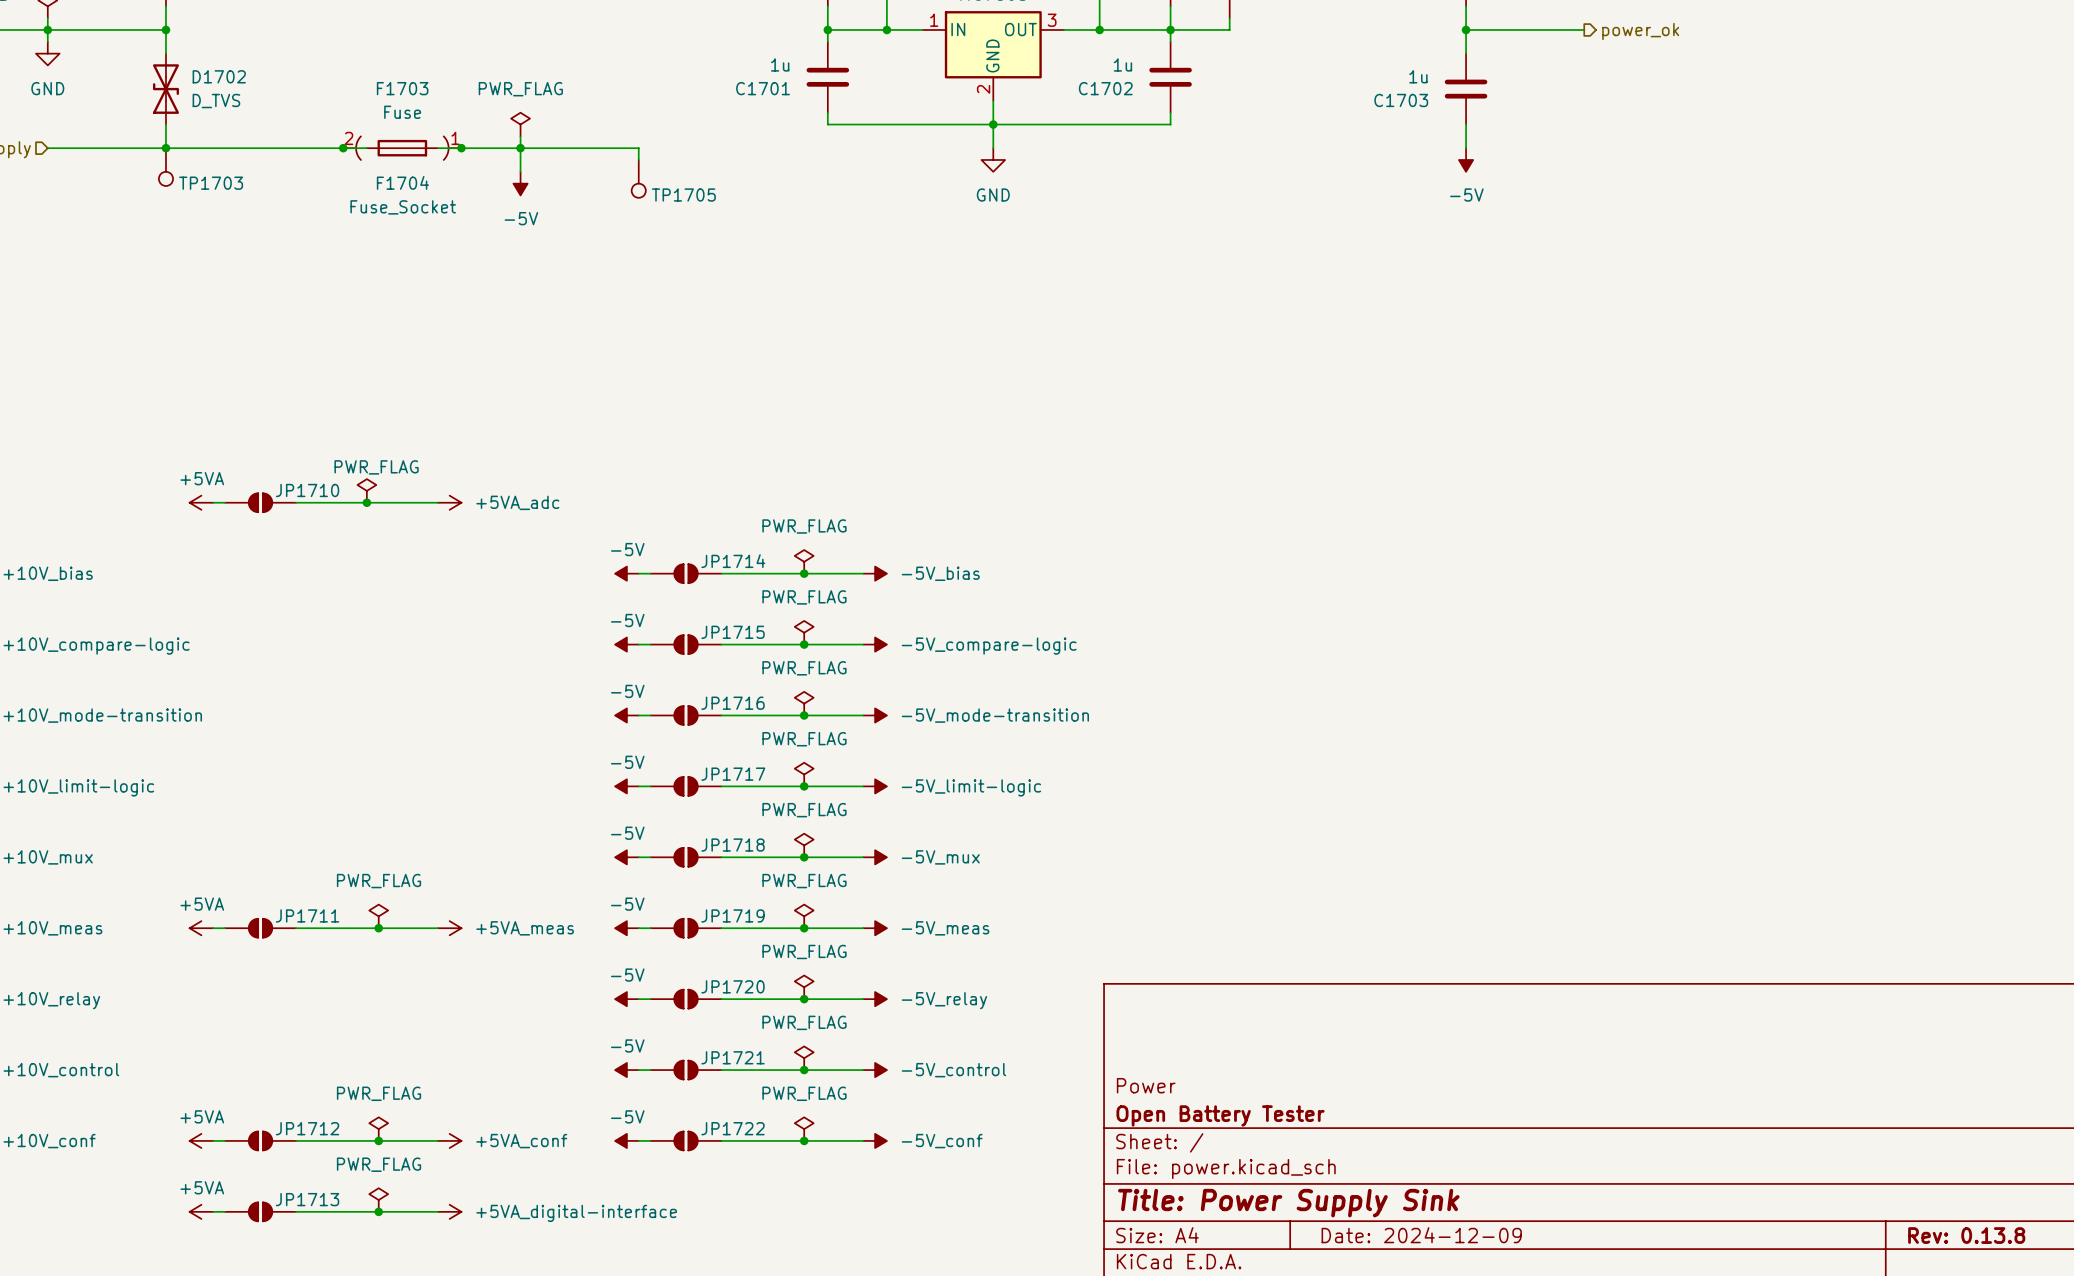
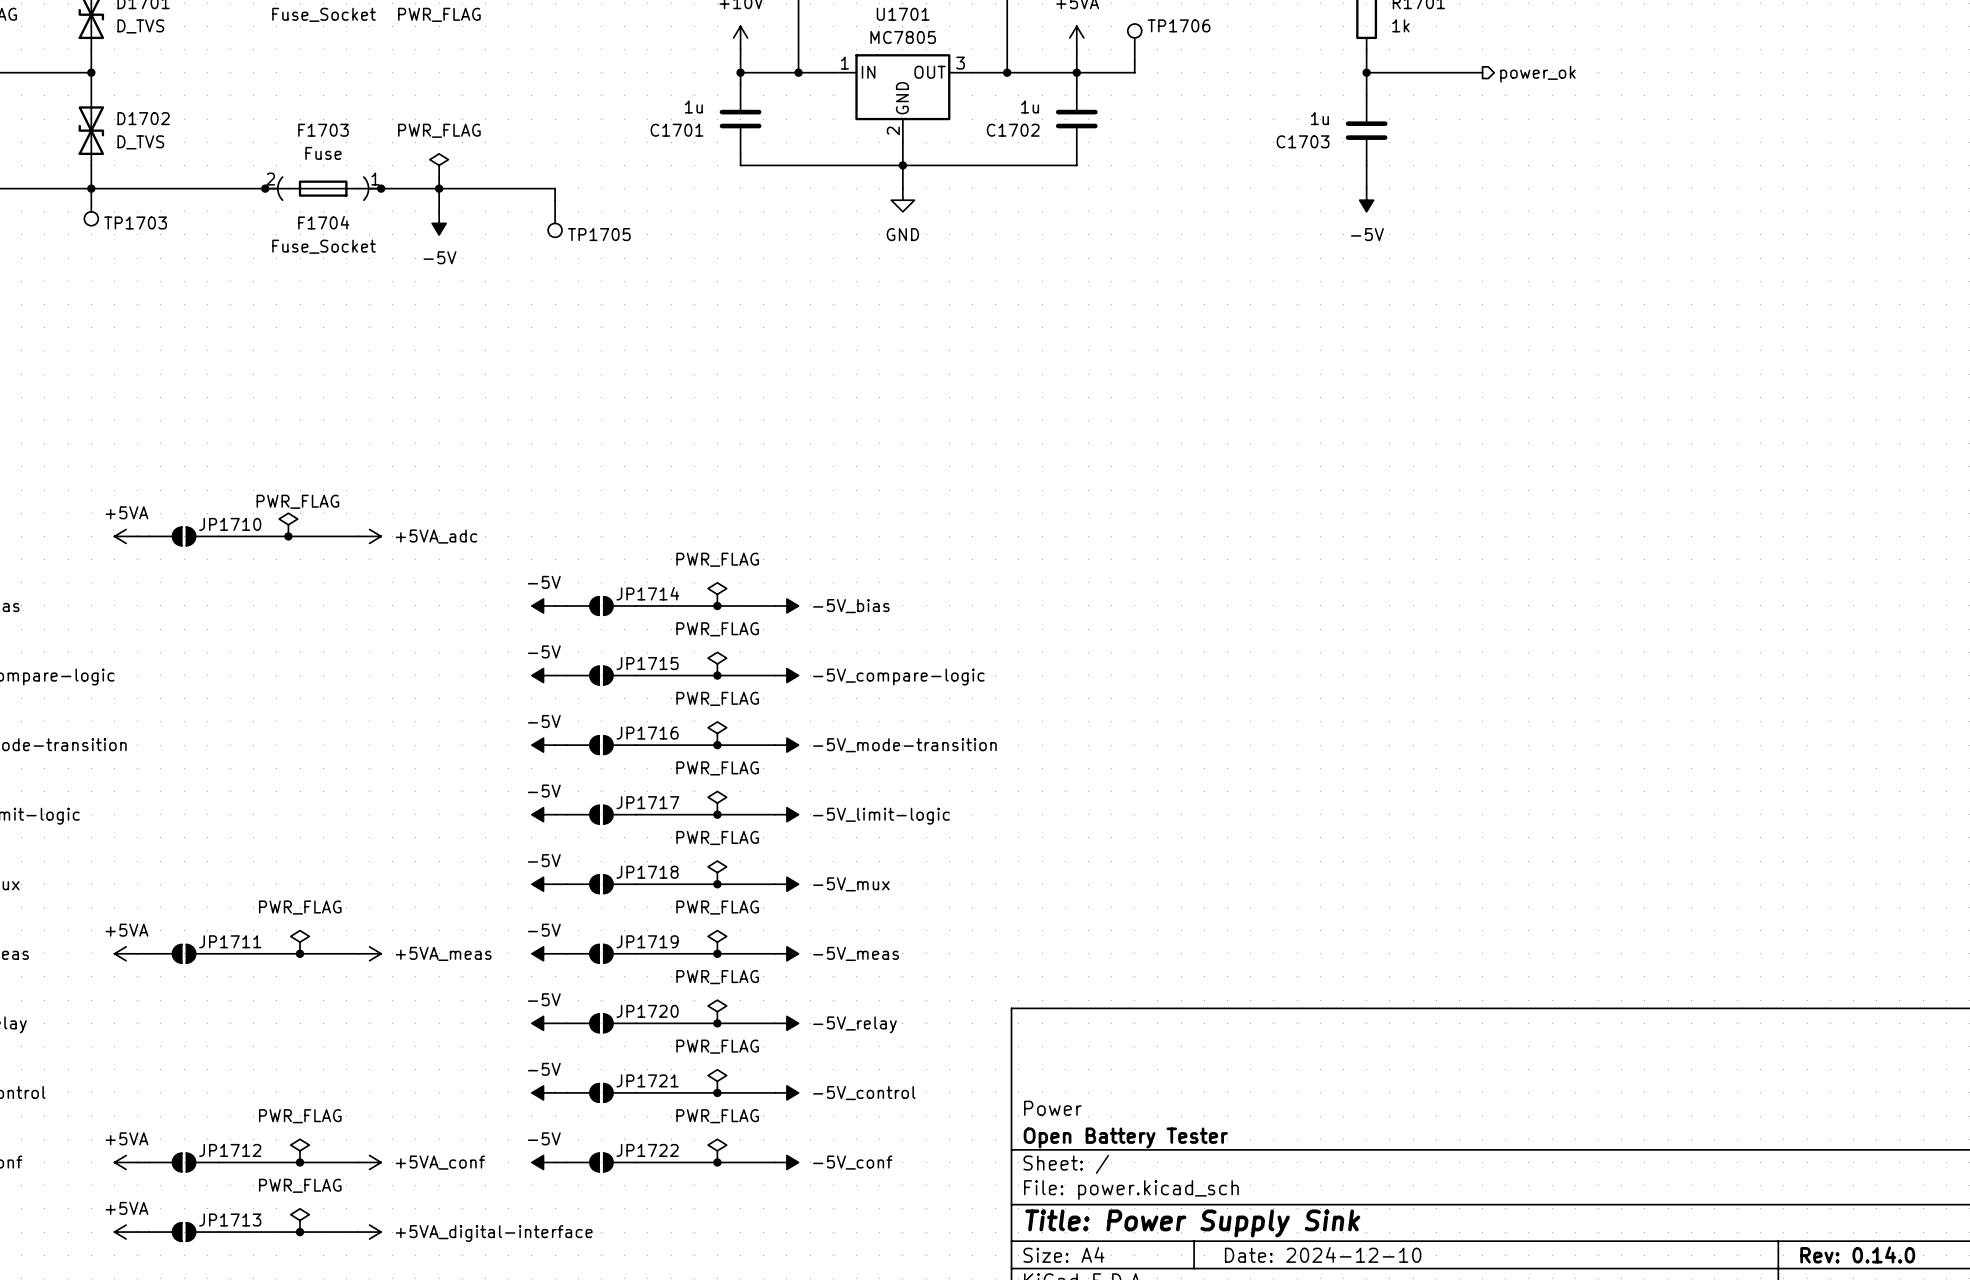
title block: Date: 2024-12-09 (1421, 1235) -> Date: 2024-12-10 (1323, 1254)
title block: Rev: 0.13.8 (1966, 1235) -> Rev: 0.14.0 (1857, 1254)

